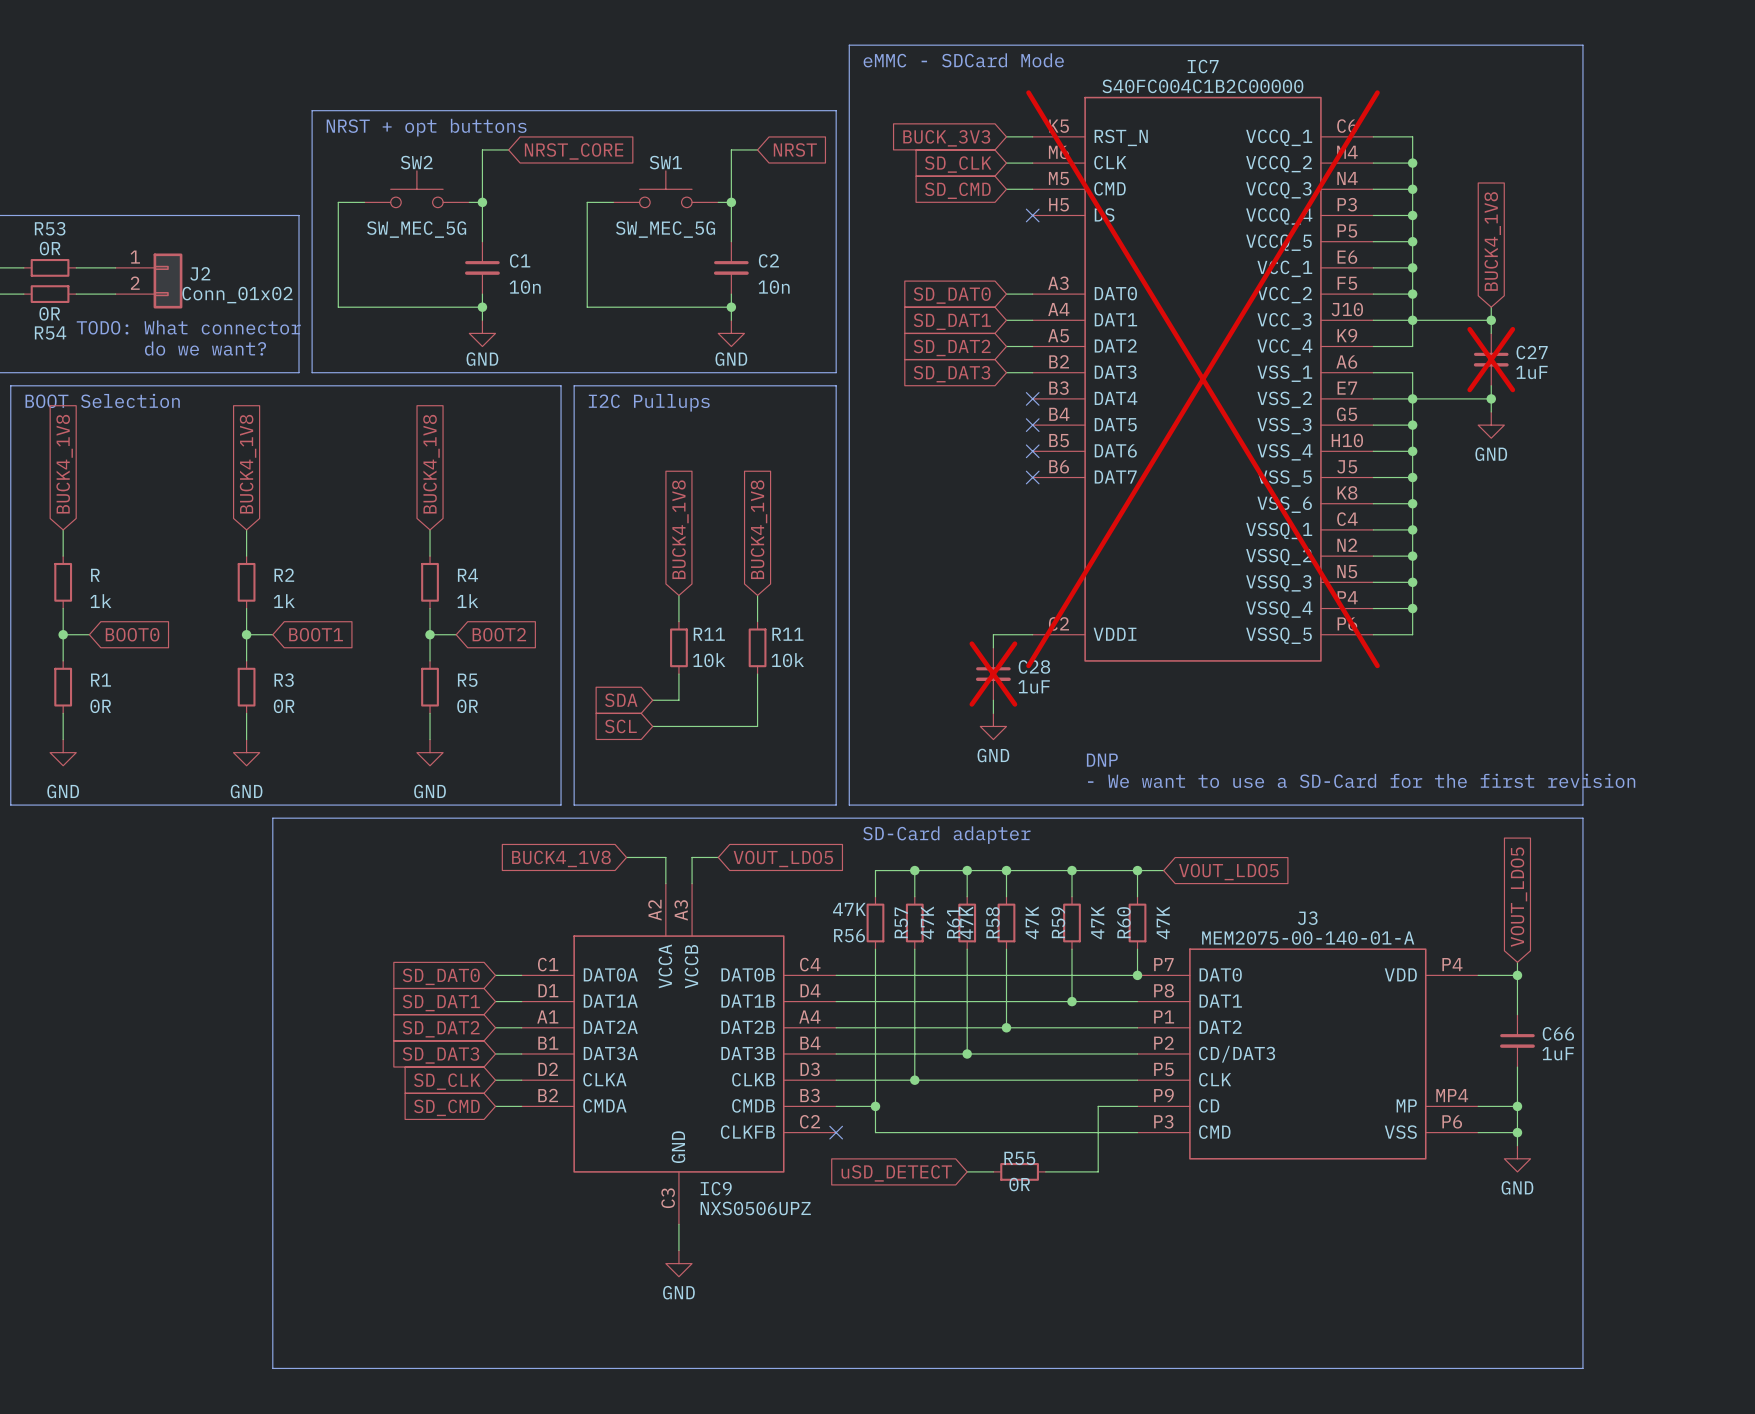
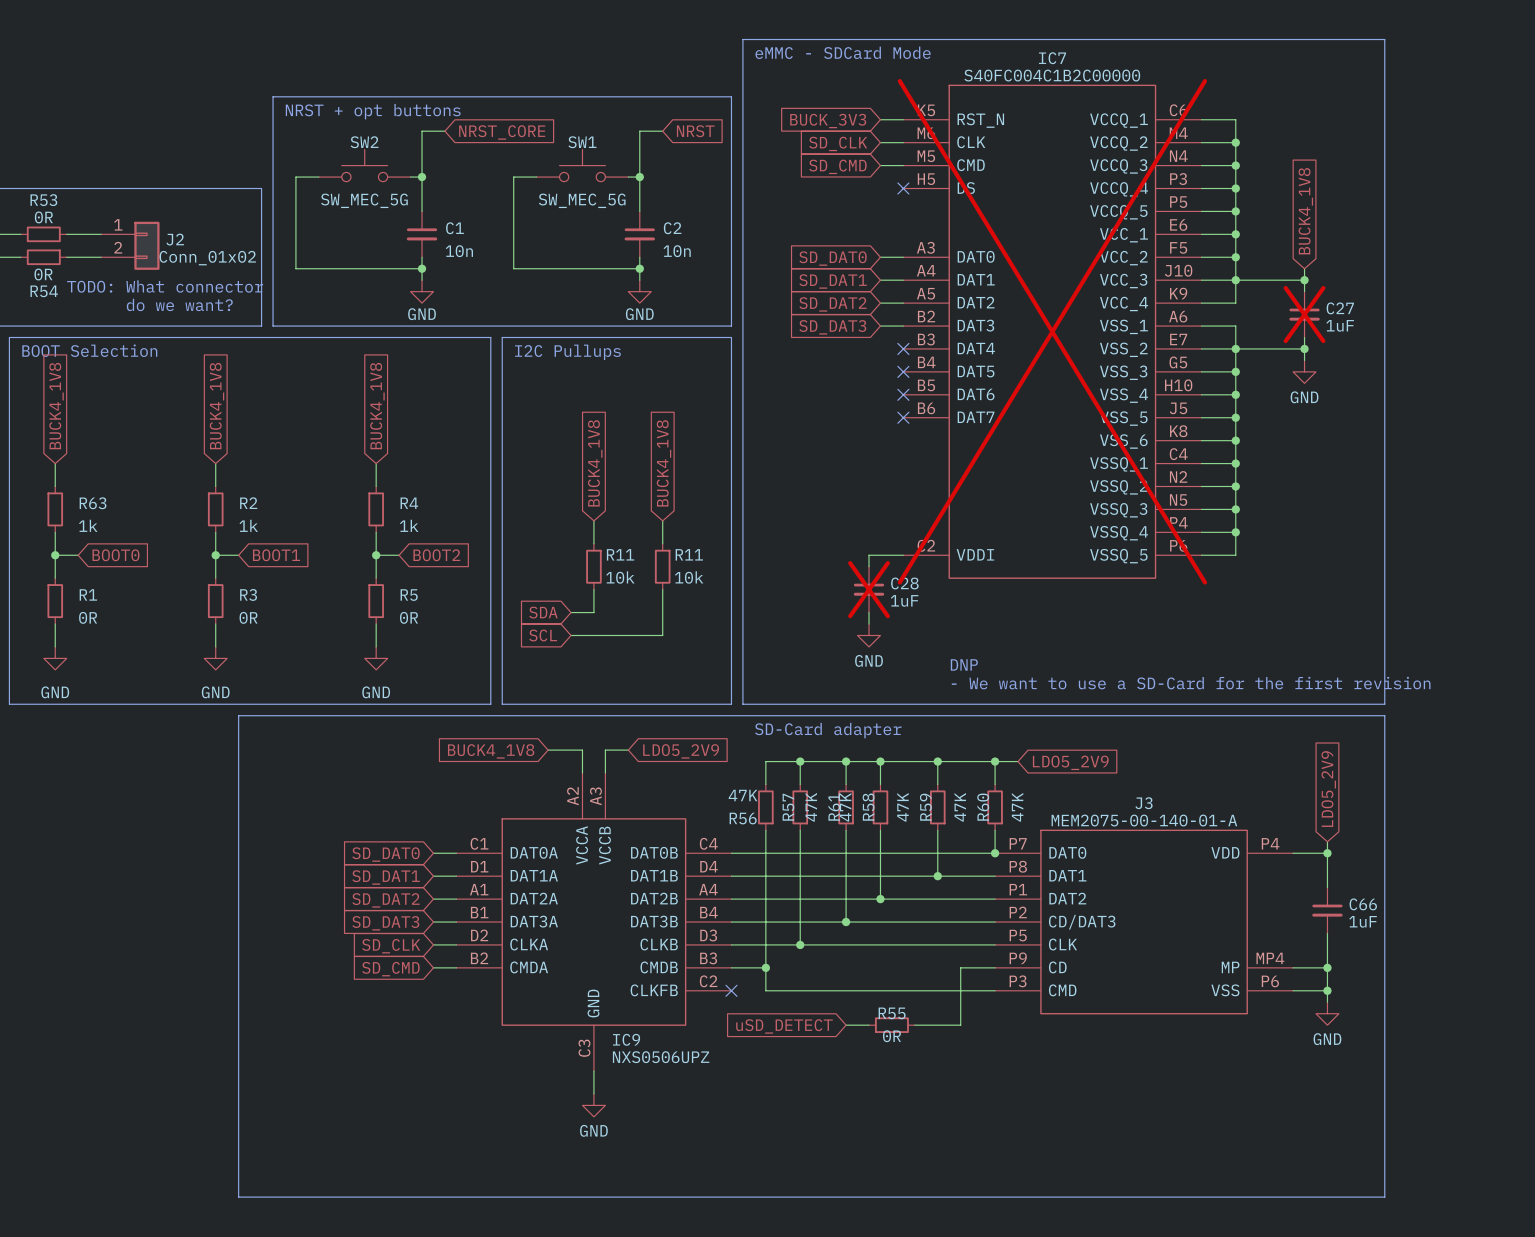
R name: R (95, 575) -> R63 (93, 503)
global label: VOUT_LDO5 (783, 858) -> LDO5_2V9 (681, 751)
global label: VOUT_LDO5 (1228, 872) -> LDO5_2V9 (1070, 762)
global label: VOUT_LDO5 (1518, 897) -> LDO5_2V9 (1328, 789)

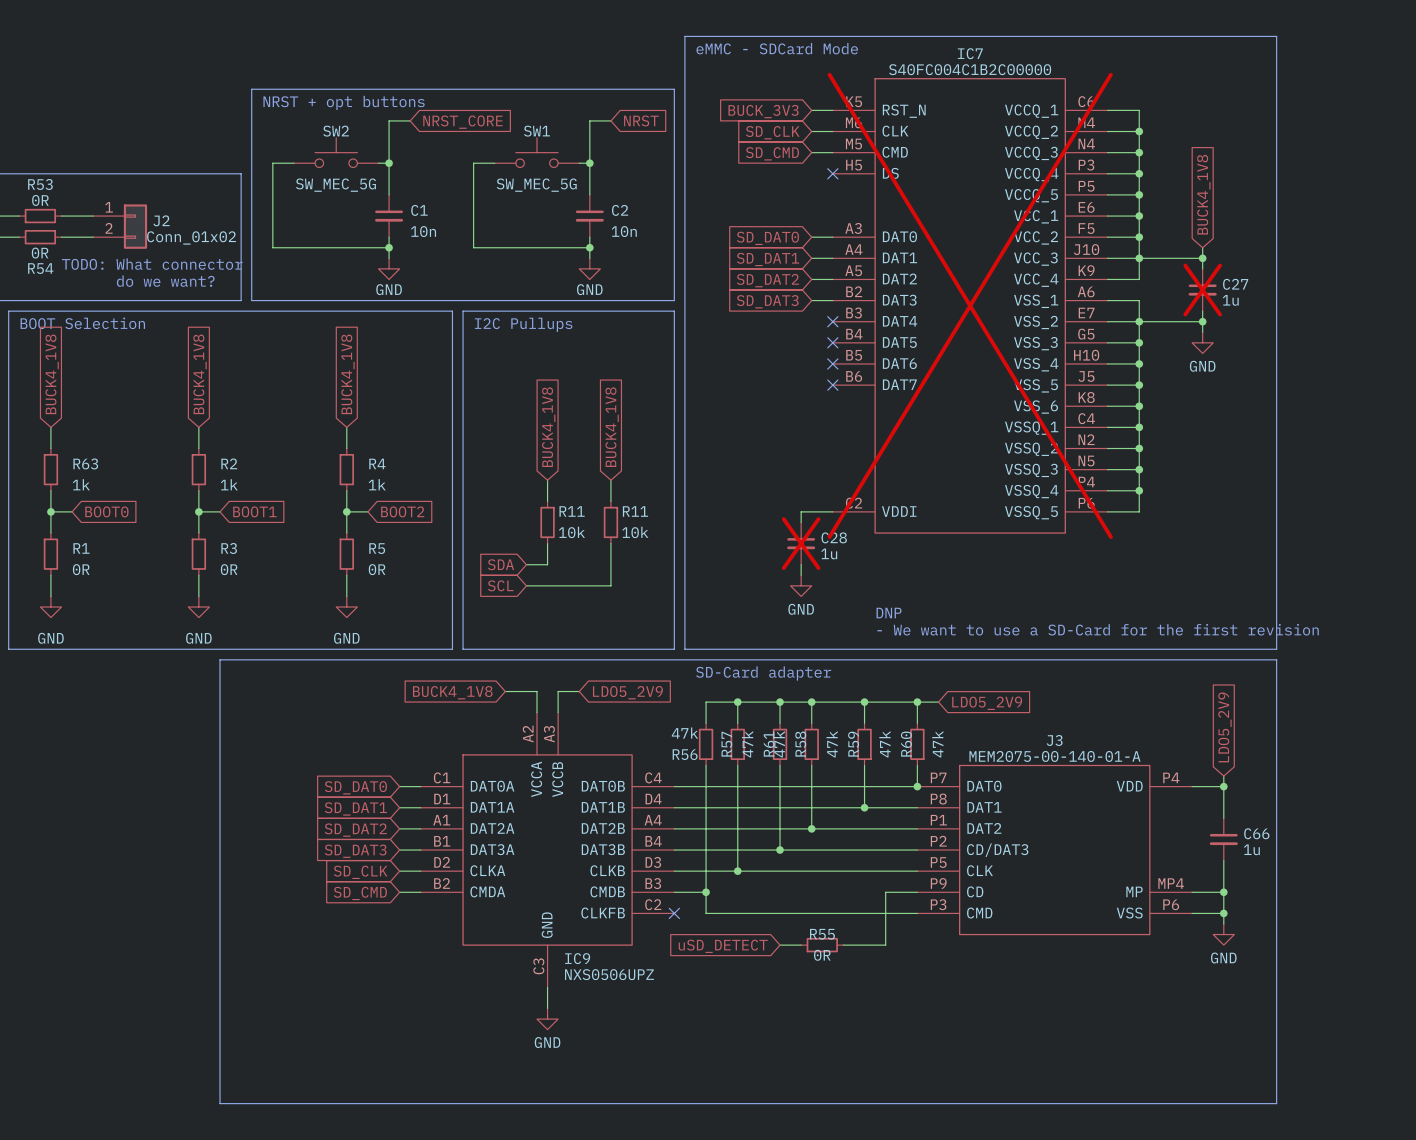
C27 value: 1uF (1340, 325) -> 1u (1230, 300)
C28 value: 1uF (904, 600) -> 1u (829, 553)
R56 value: 47K (743, 795) -> 47k (684, 733)
R57 value: 47K (811, 807) -> 47k (747, 744)
R61 value: 47K (845, 807) -> 47k (779, 744)
R58 value: 47K (902, 807) -> 47k (832, 744)
R59 value: 47K (960, 807) -> 47k (884, 744)
R60 value: 47K (1017, 807) -> 47k (937, 744)
C66 value: 1uF (1363, 921) -> 1u (1251, 849)

